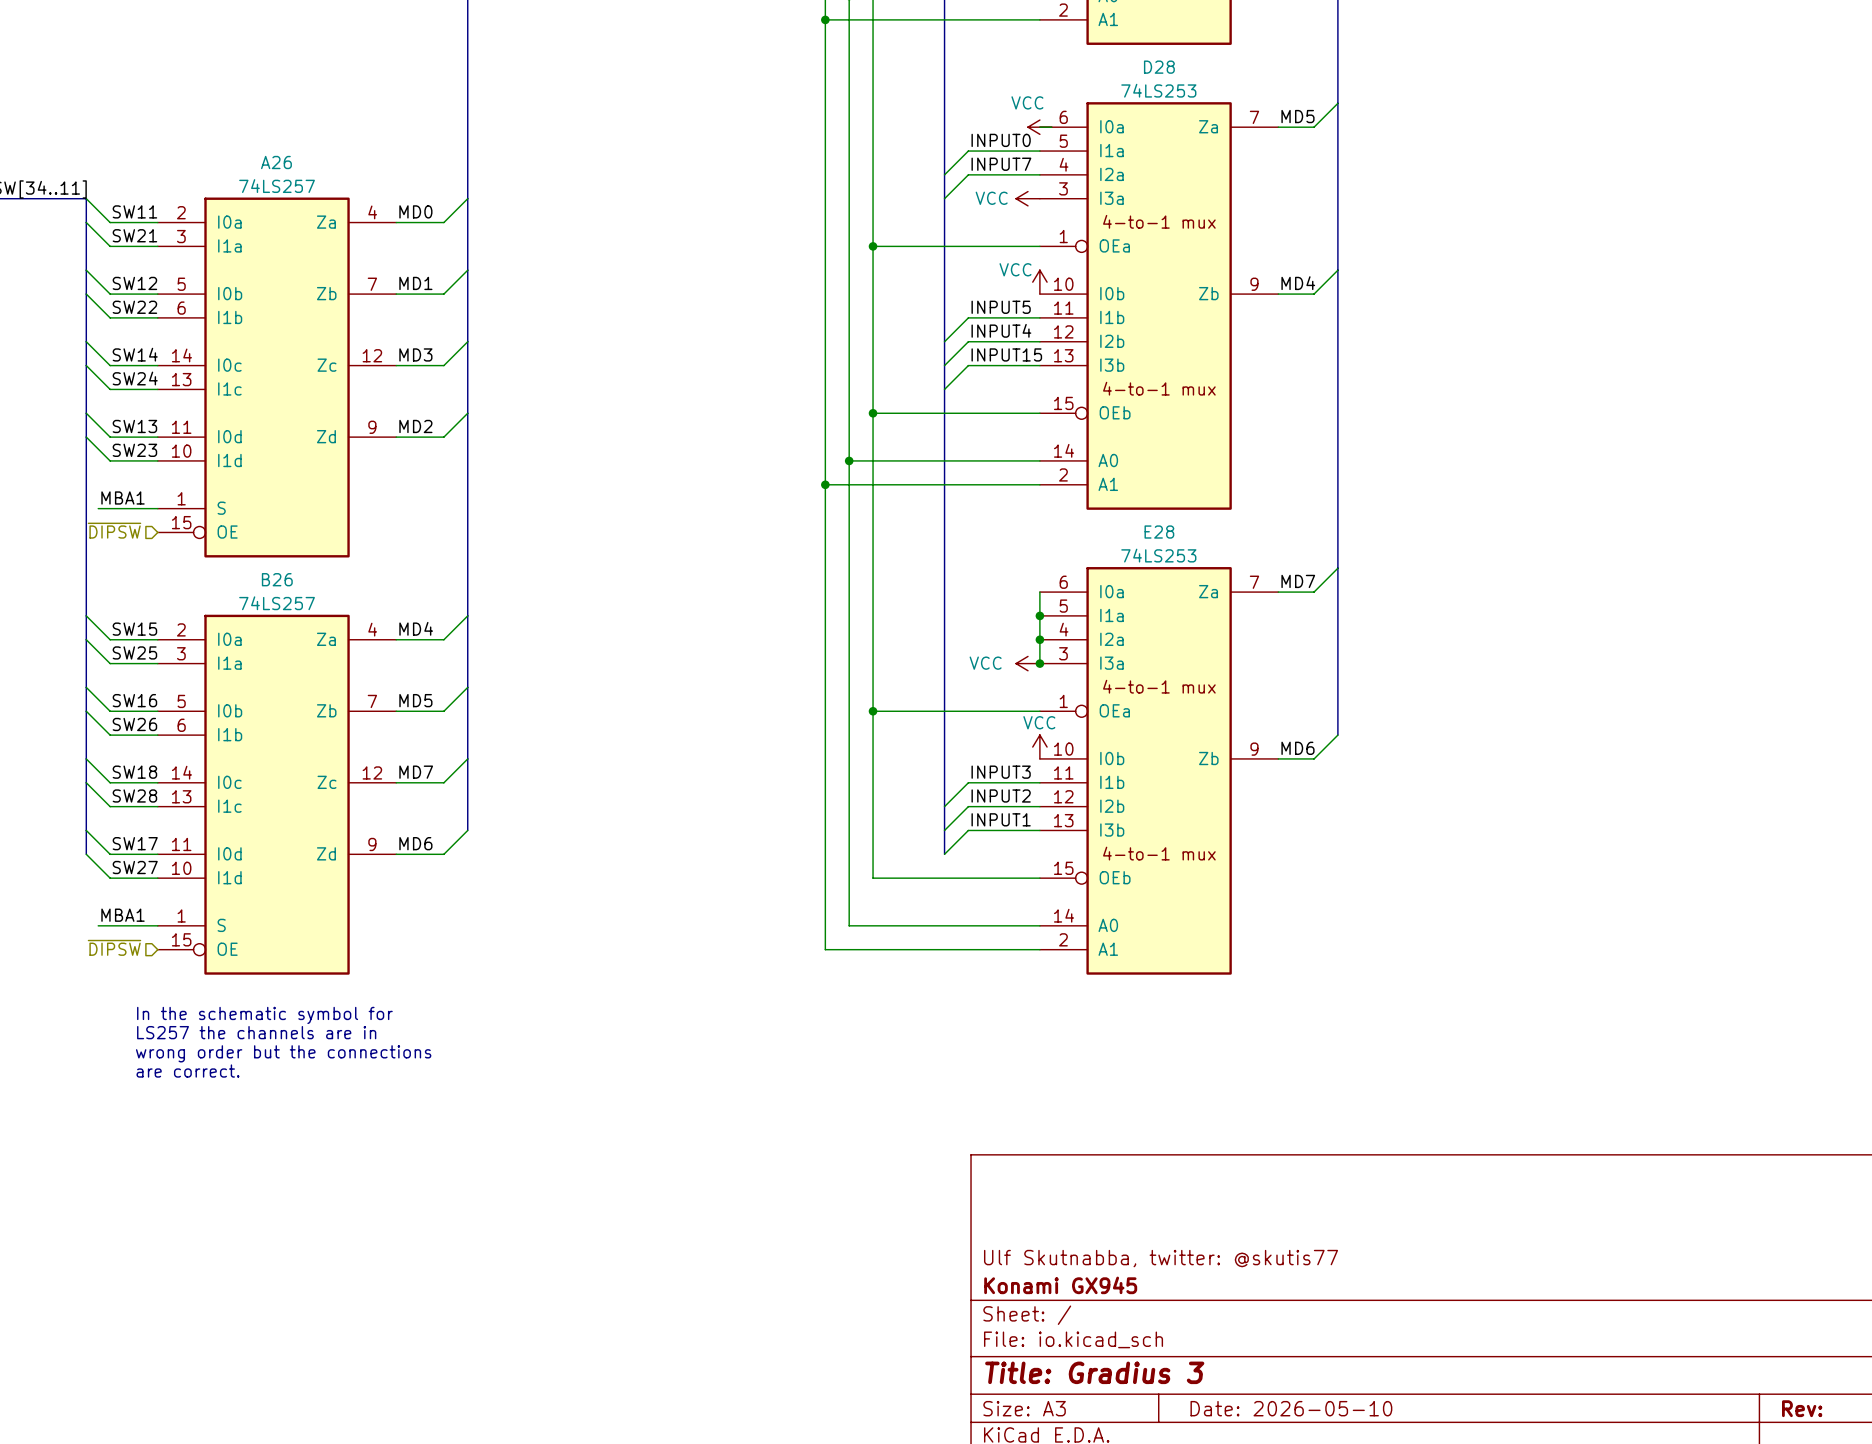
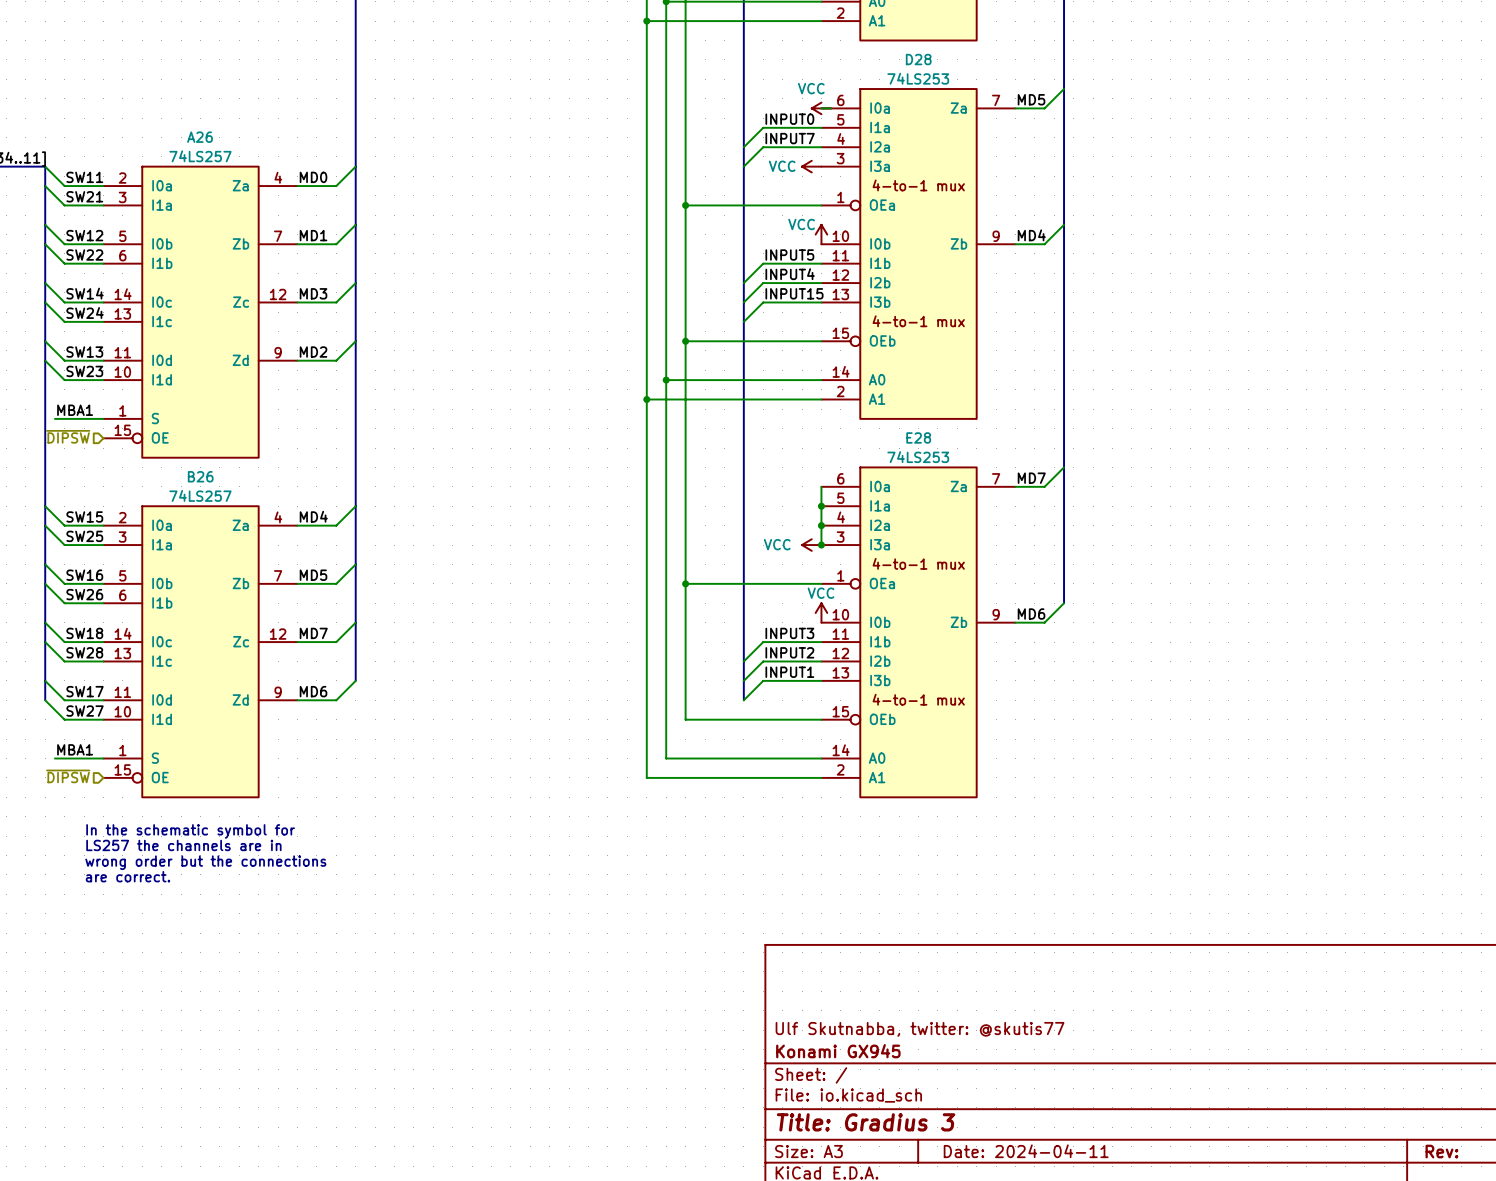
title block: Date: 2026-05-10 (1291, 1408) -> Date: 2024-04-11 (1026, 1151)

